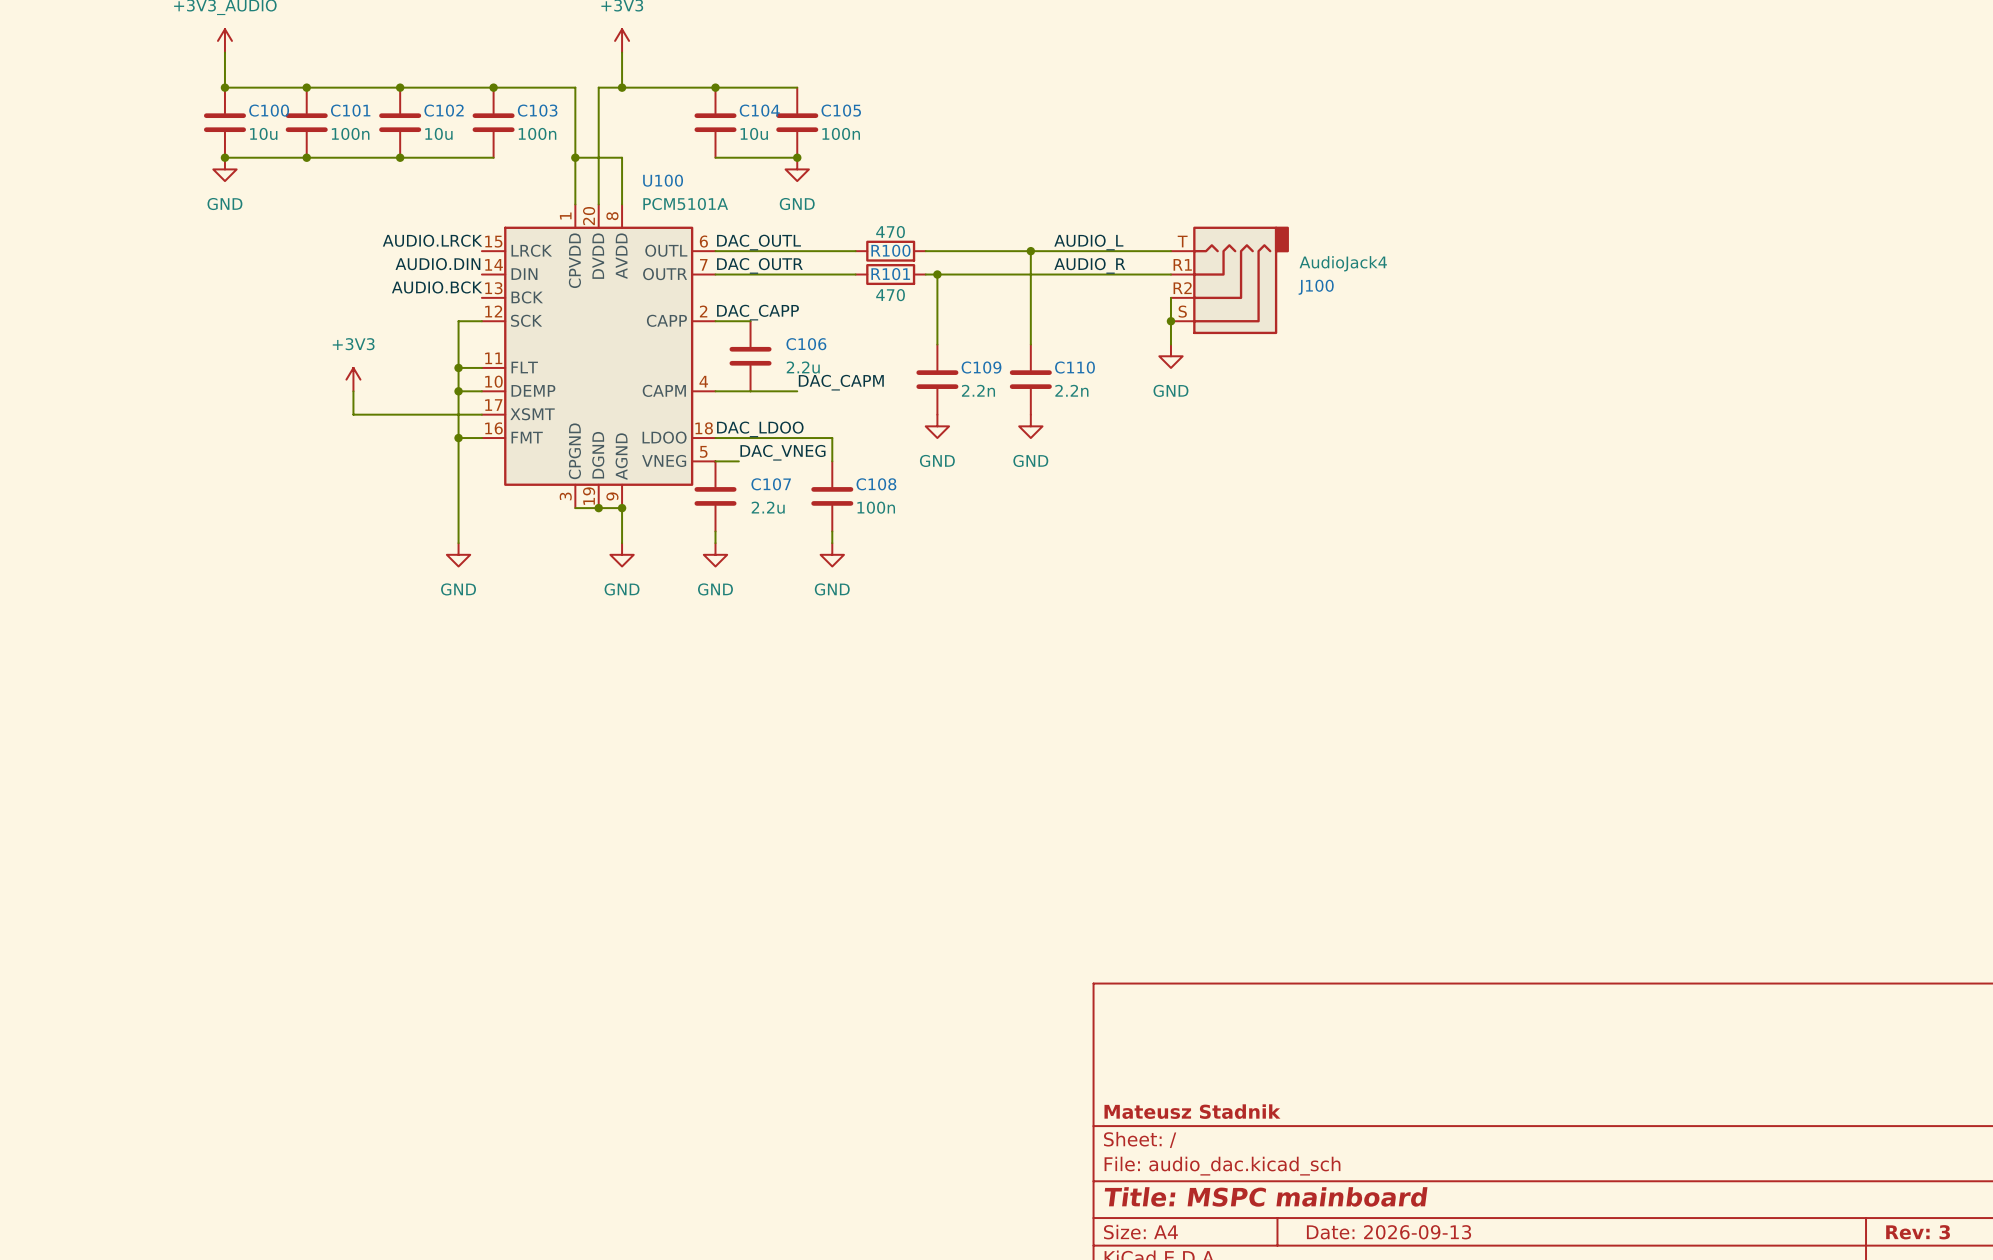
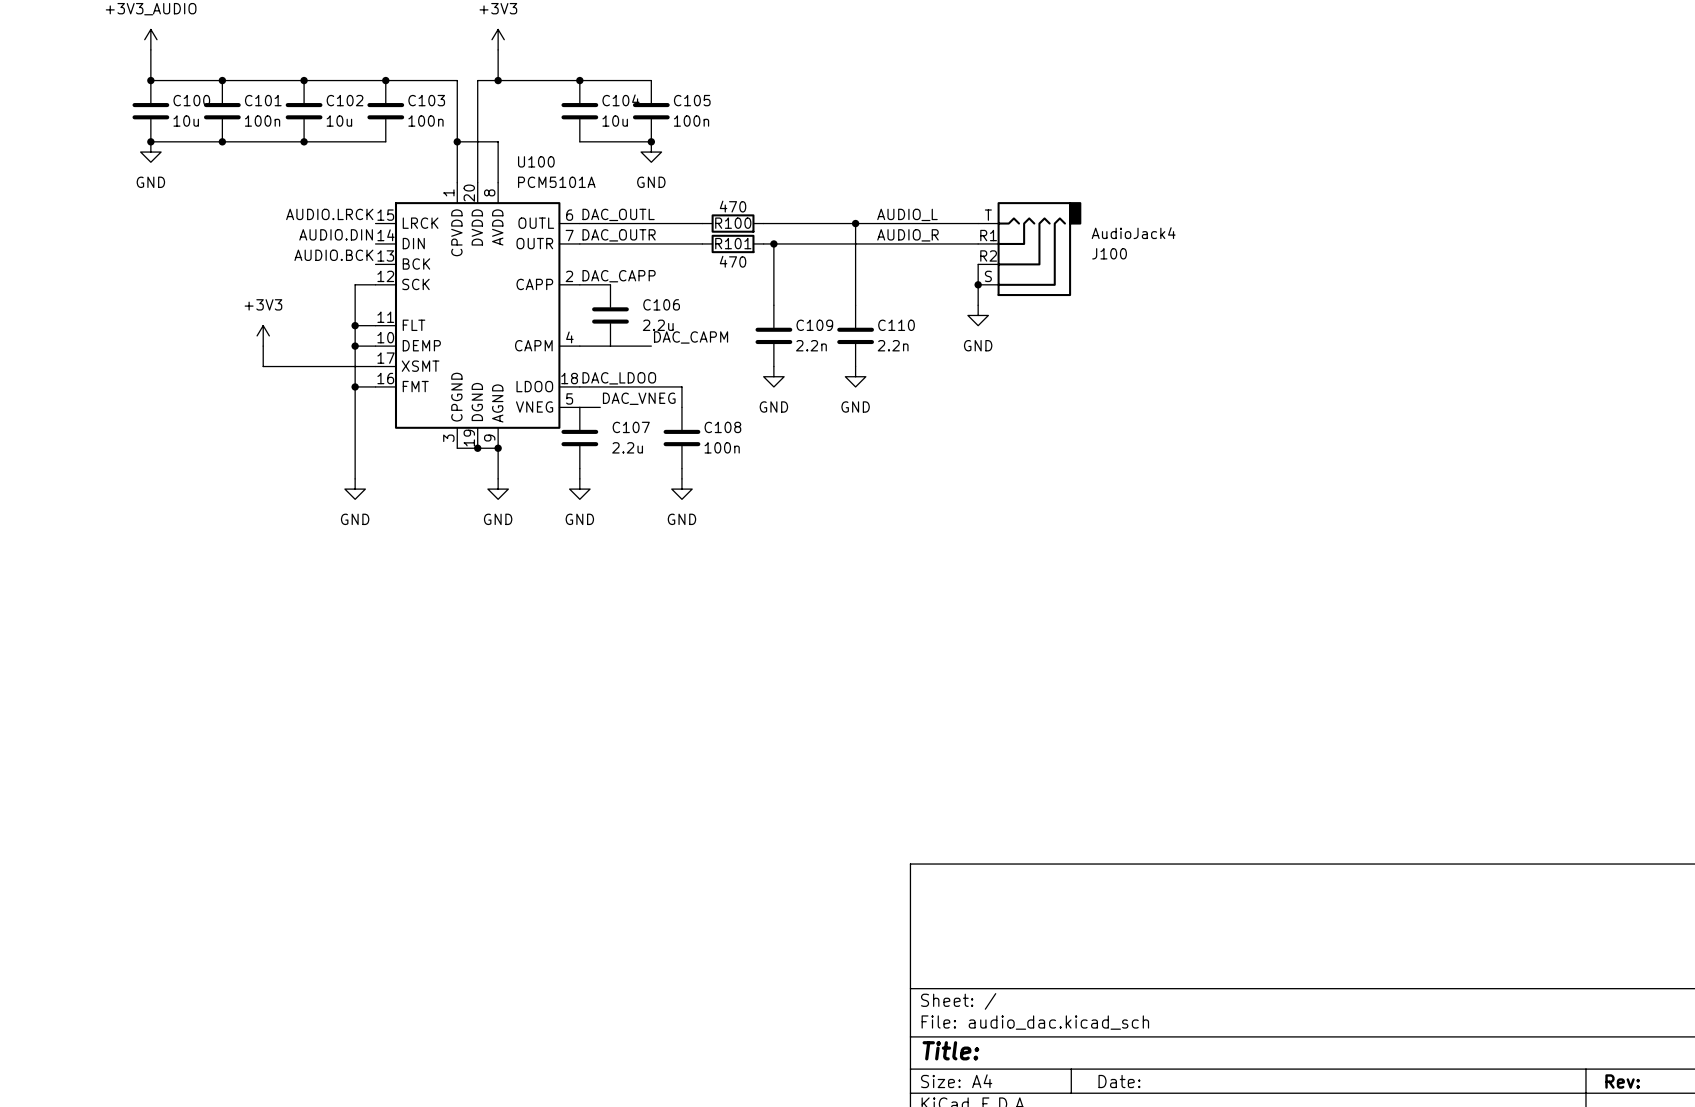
title block: Mateusz Stadnik (1192, 1111) -> none
title block: Title: MSPC mainboard (1266, 1196) -> Title: (950, 1050)
title block: Date: 2026-09-13 (1389, 1232) -> Date: (1119, 1081)
title block: Rev: 3 (1918, 1232) -> Rev: (1622, 1081)

